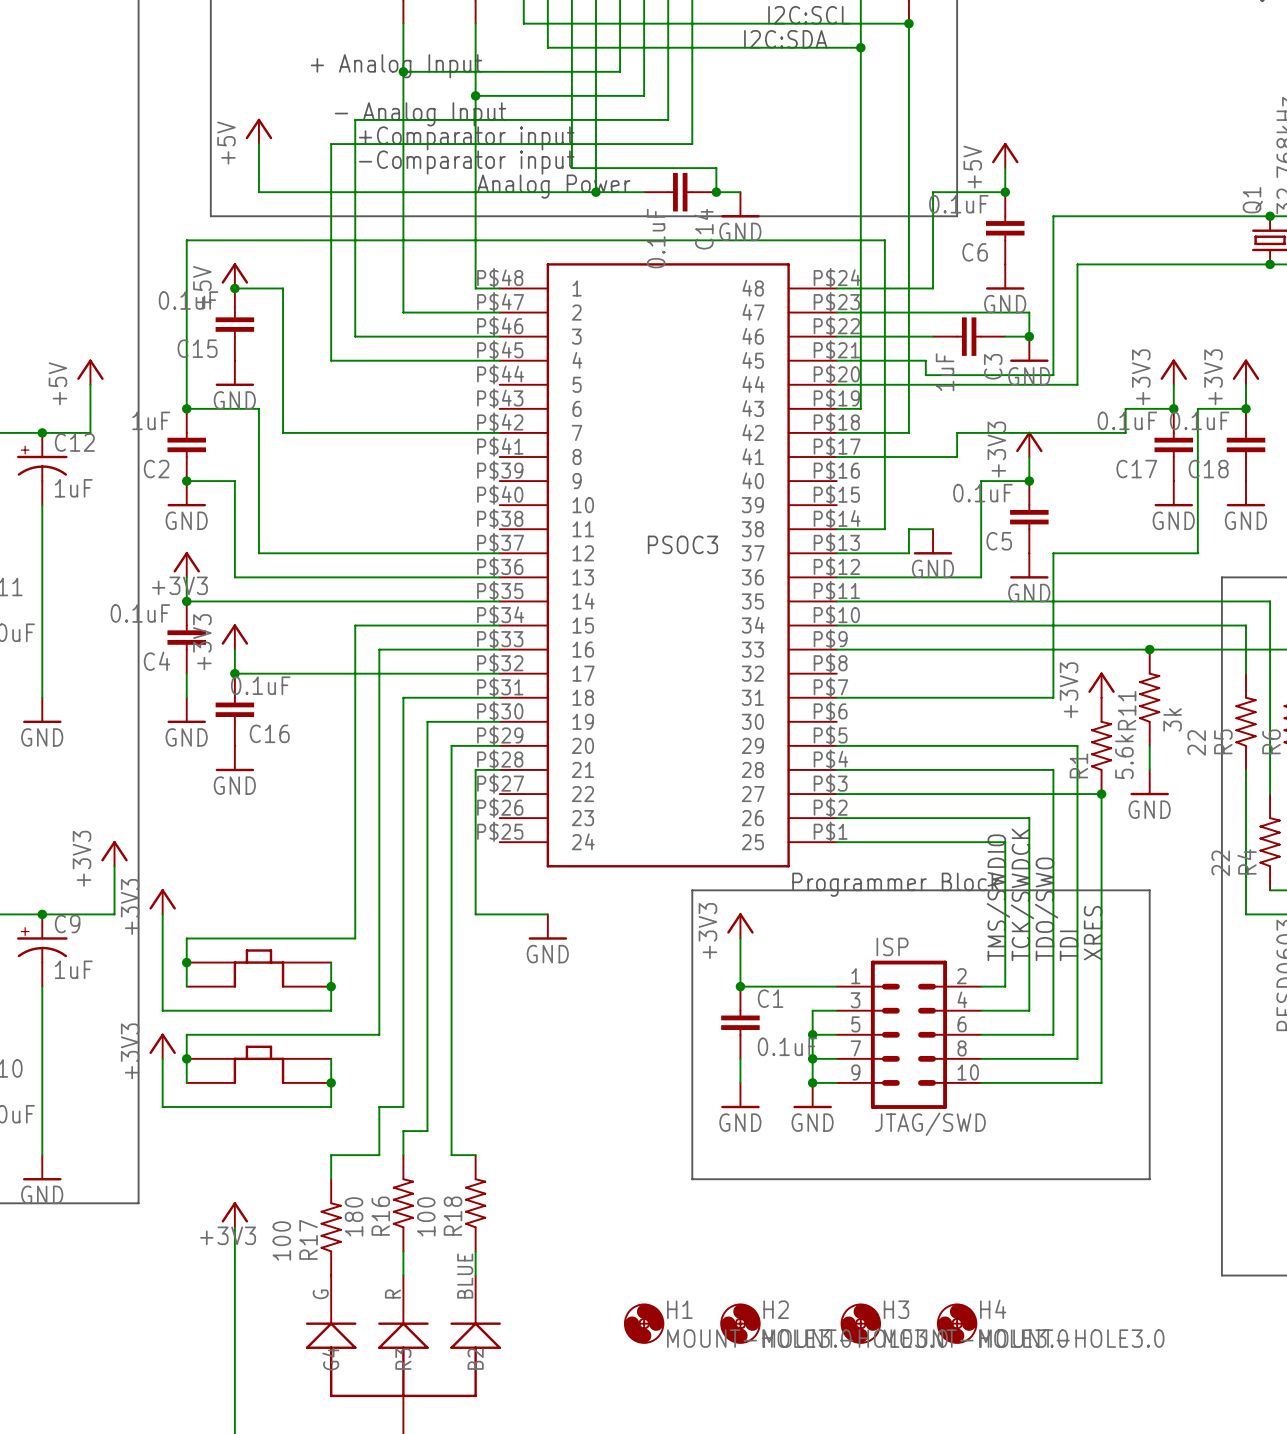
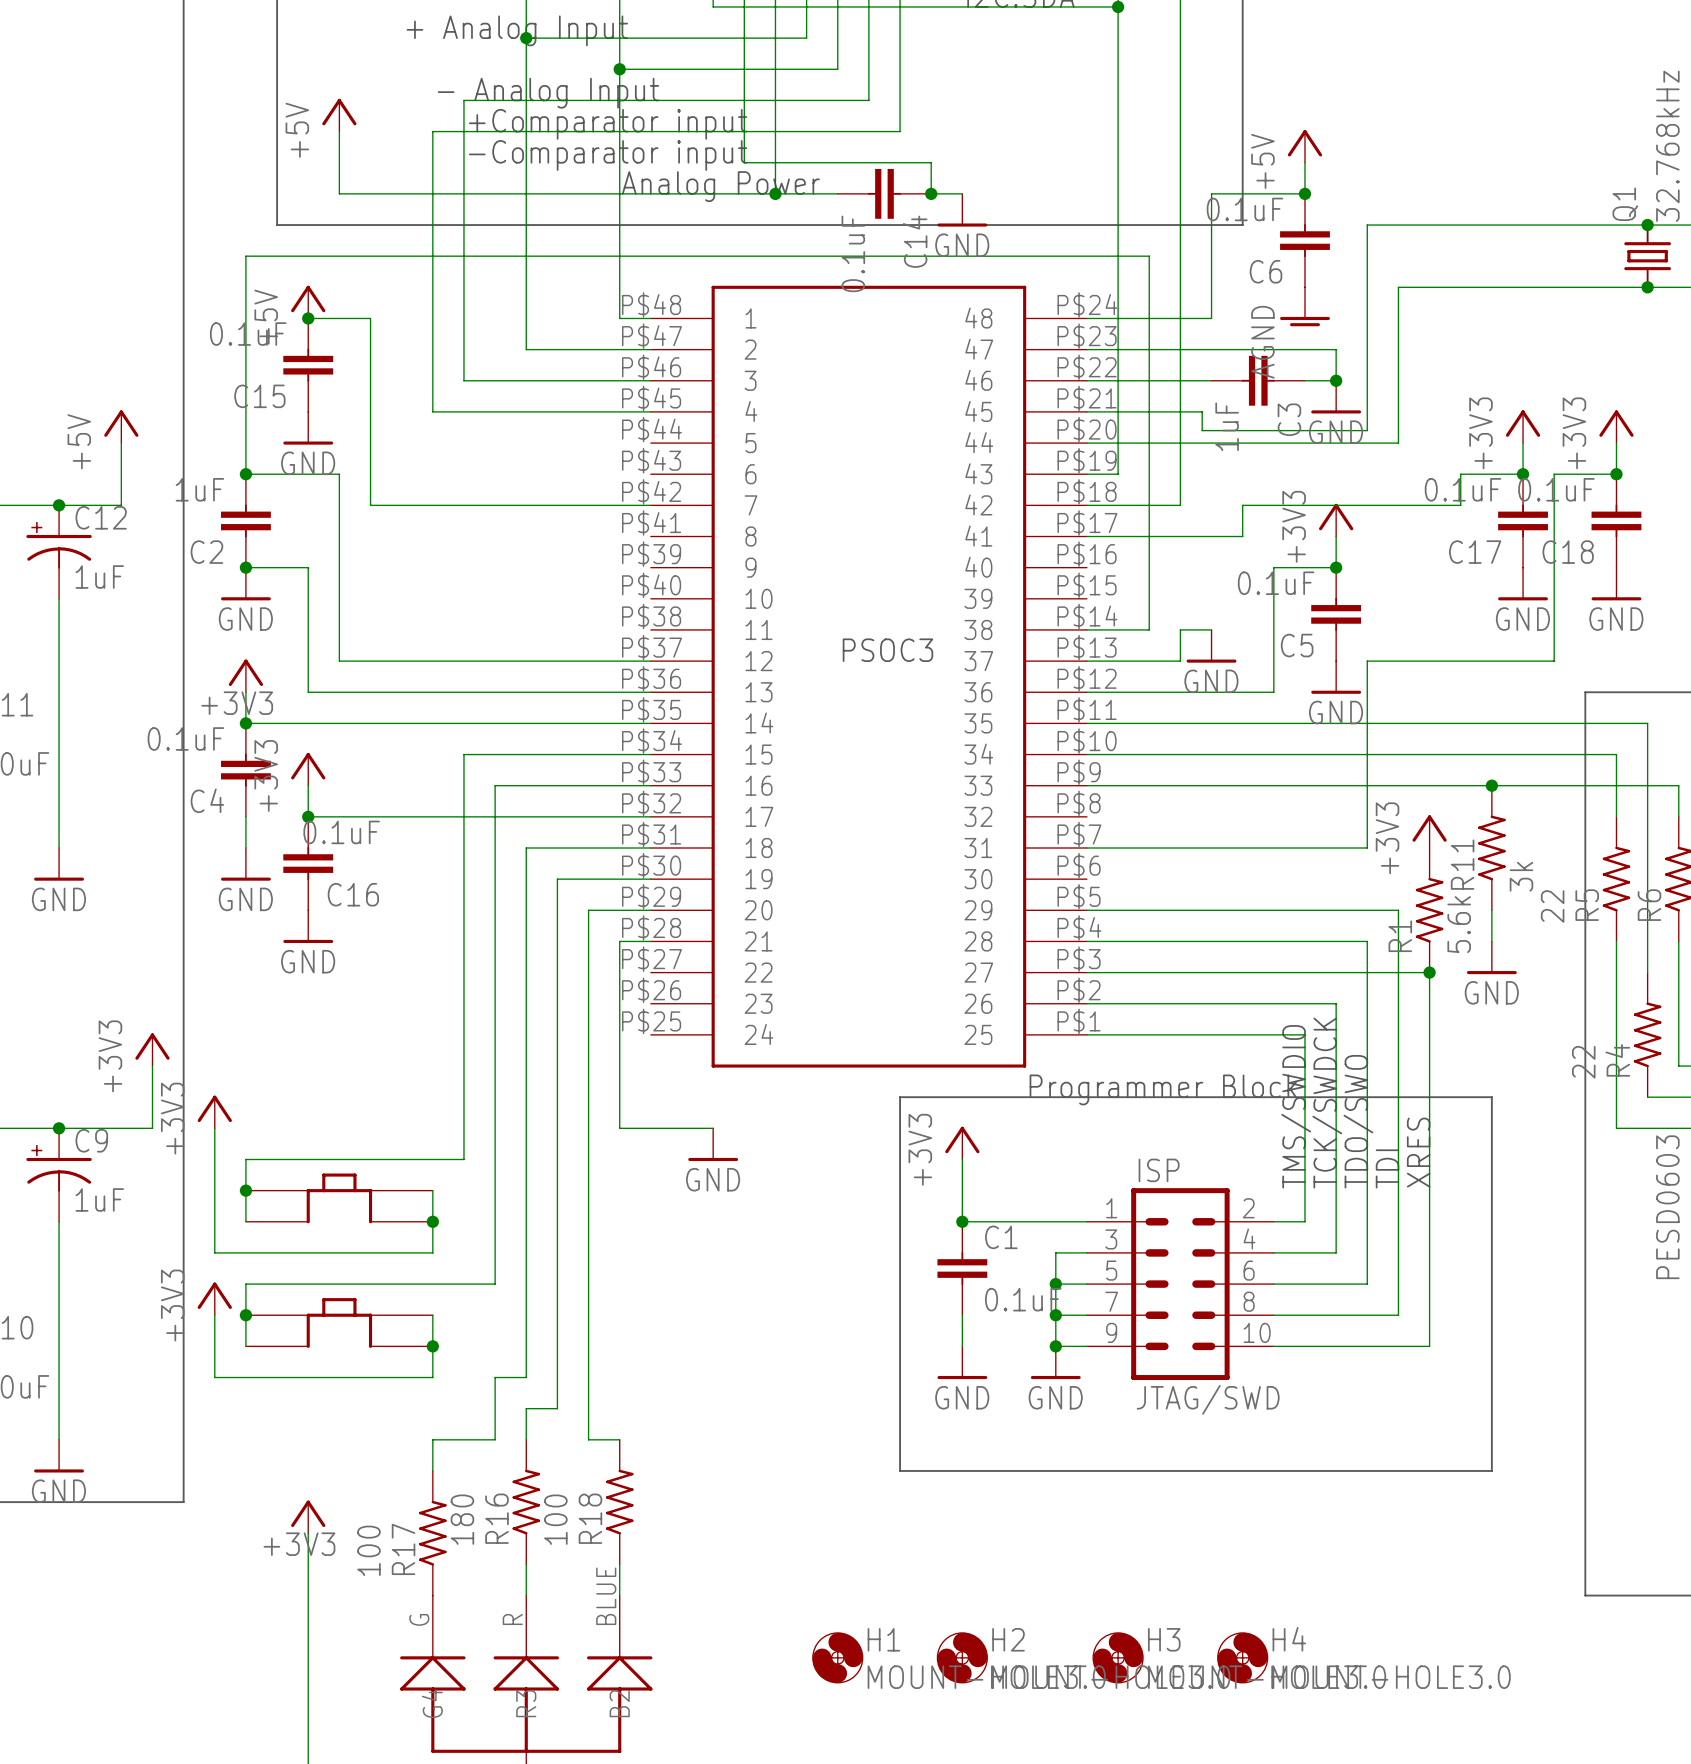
power symbol: GND (1005, 277) -> AGND (1304, 306)

